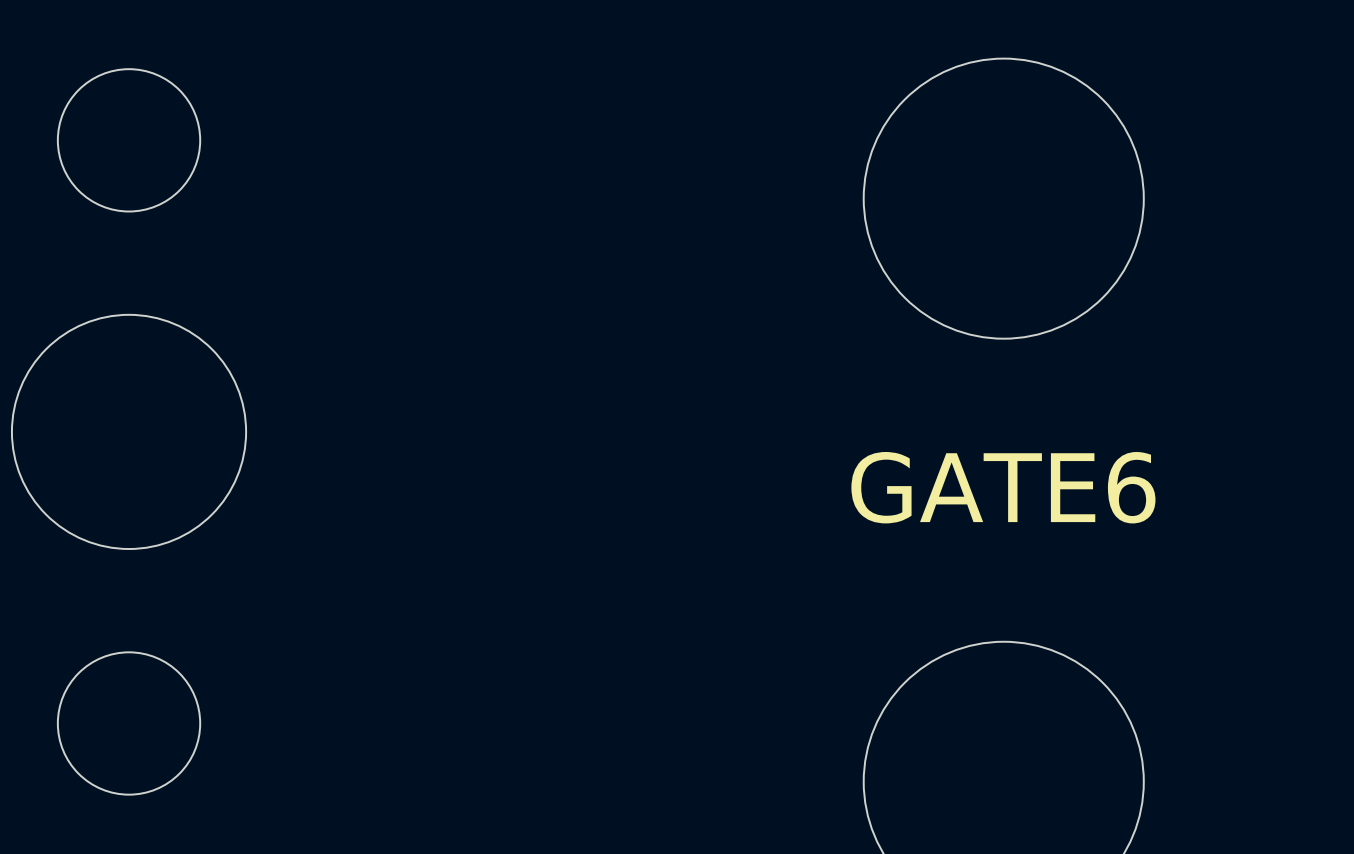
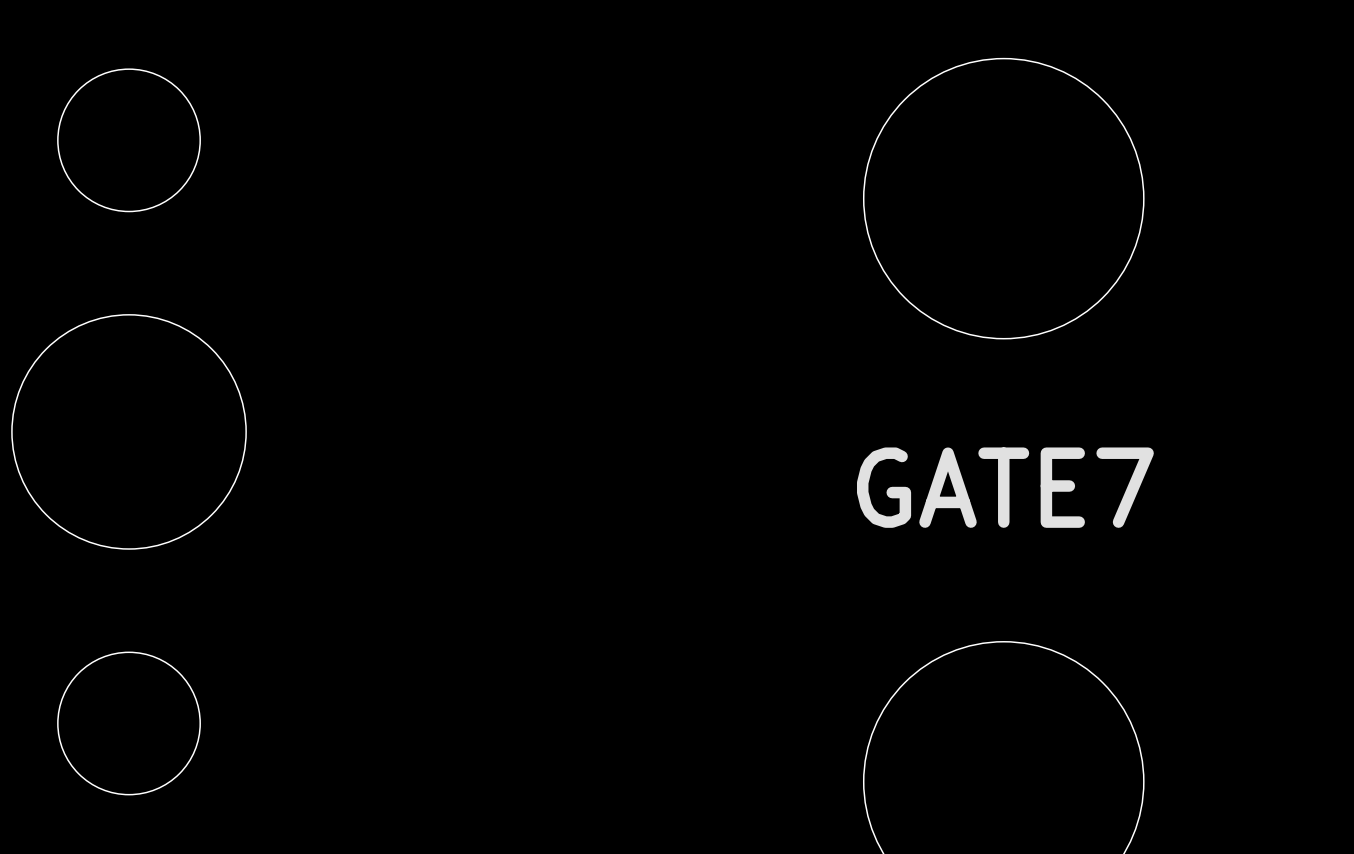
GATE7 name: none -> GATE7 (1005, 487)
text: GATE6 (1003, 487) -> none

